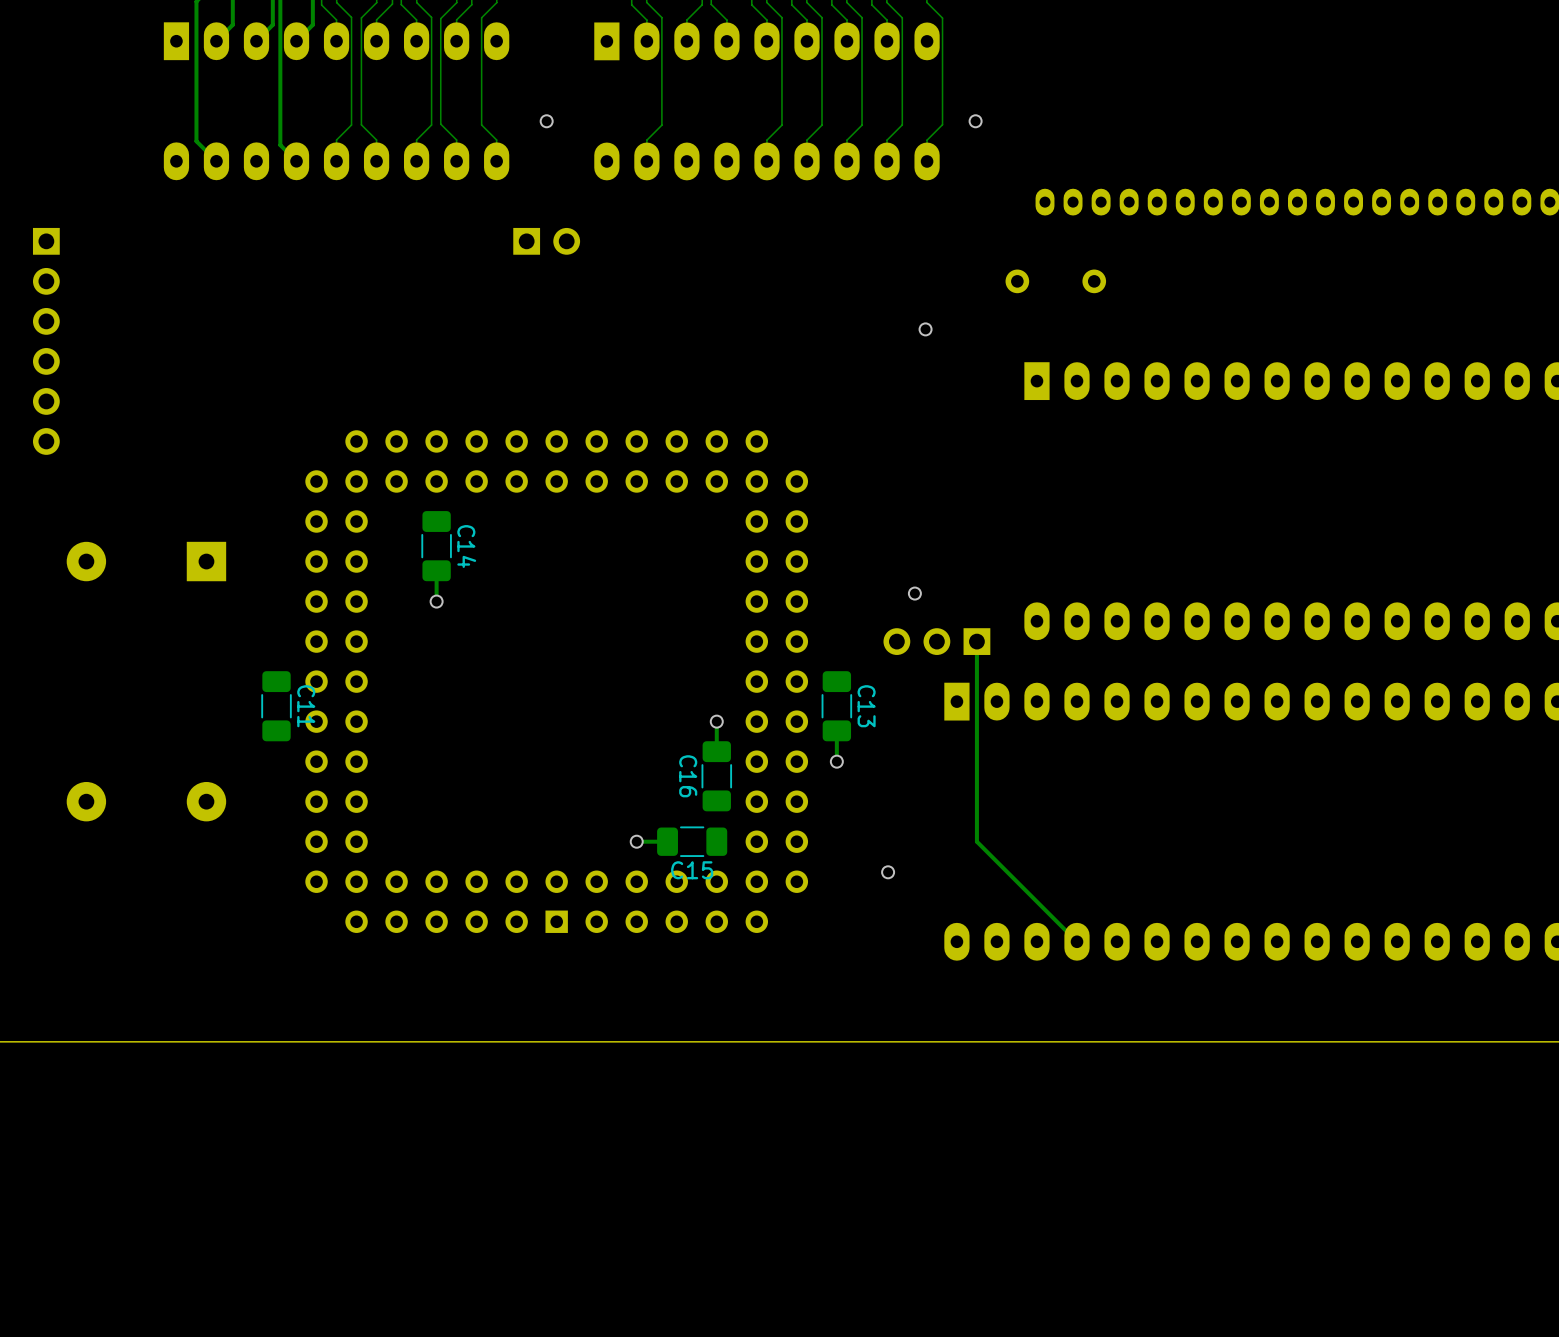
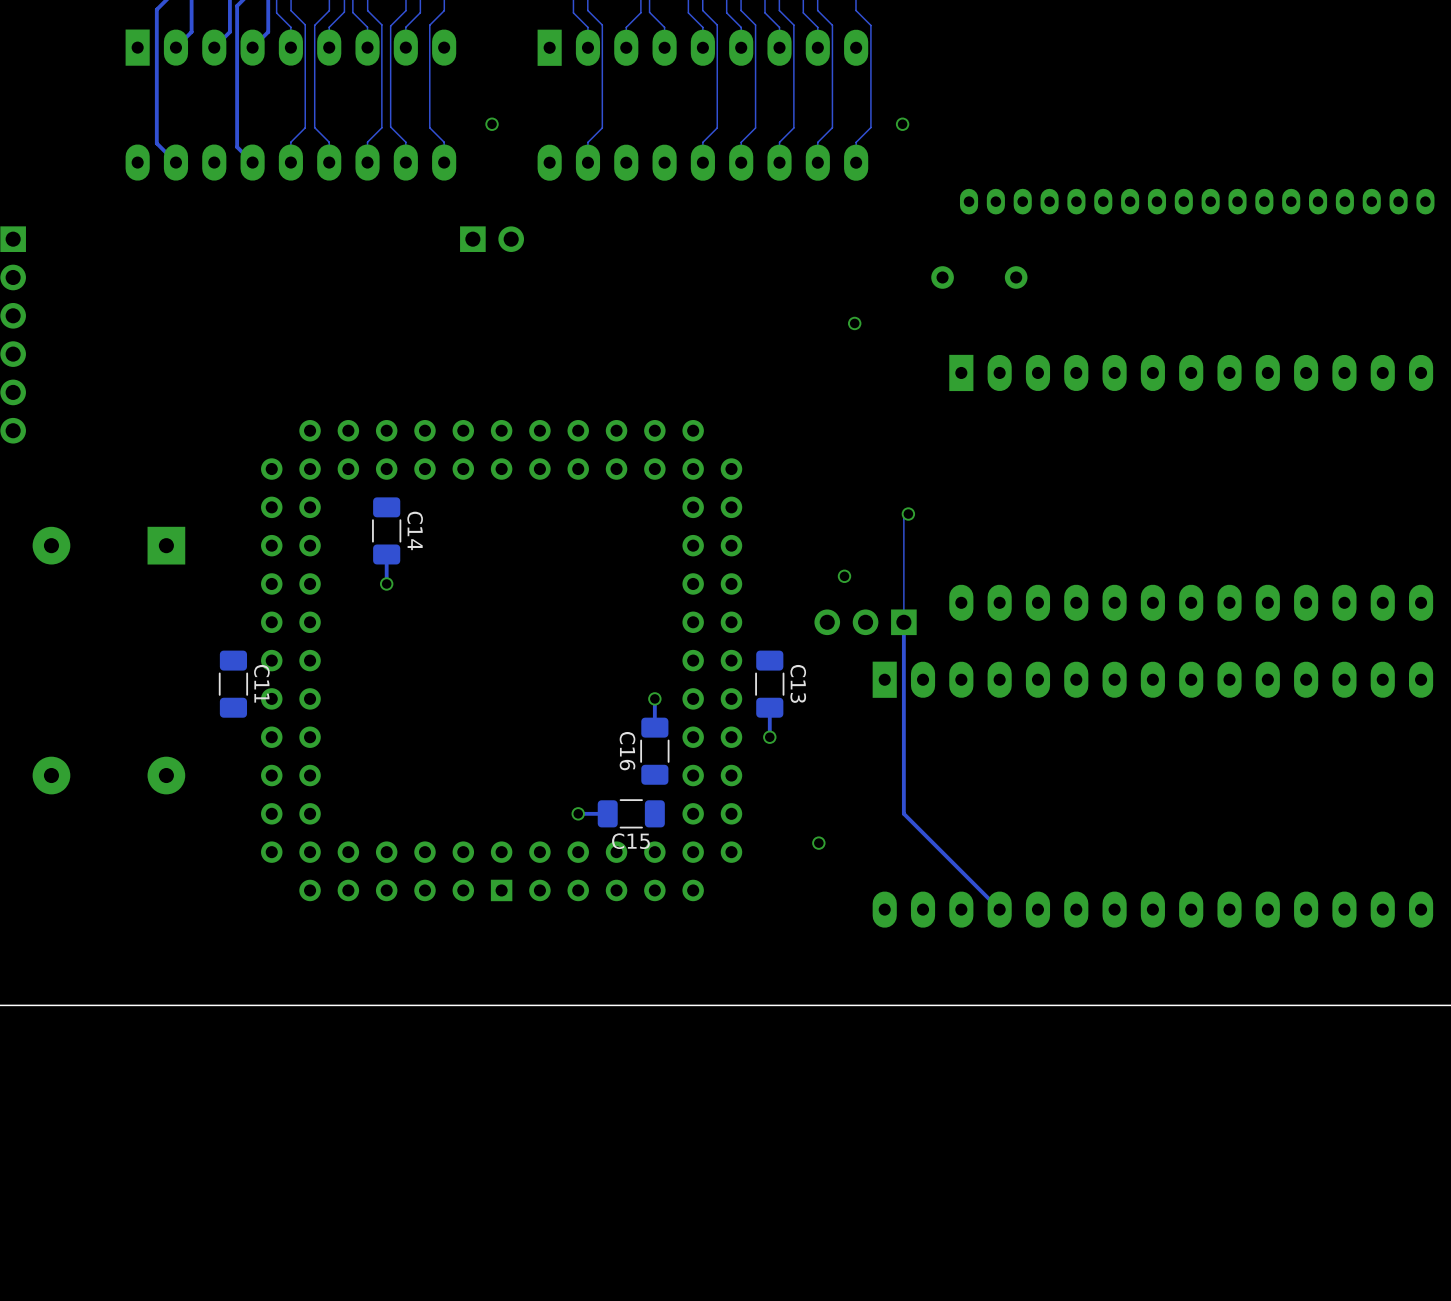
track: none -> (908, 514) (903, 518) (903, 622)
via: none -> (908, 514)

